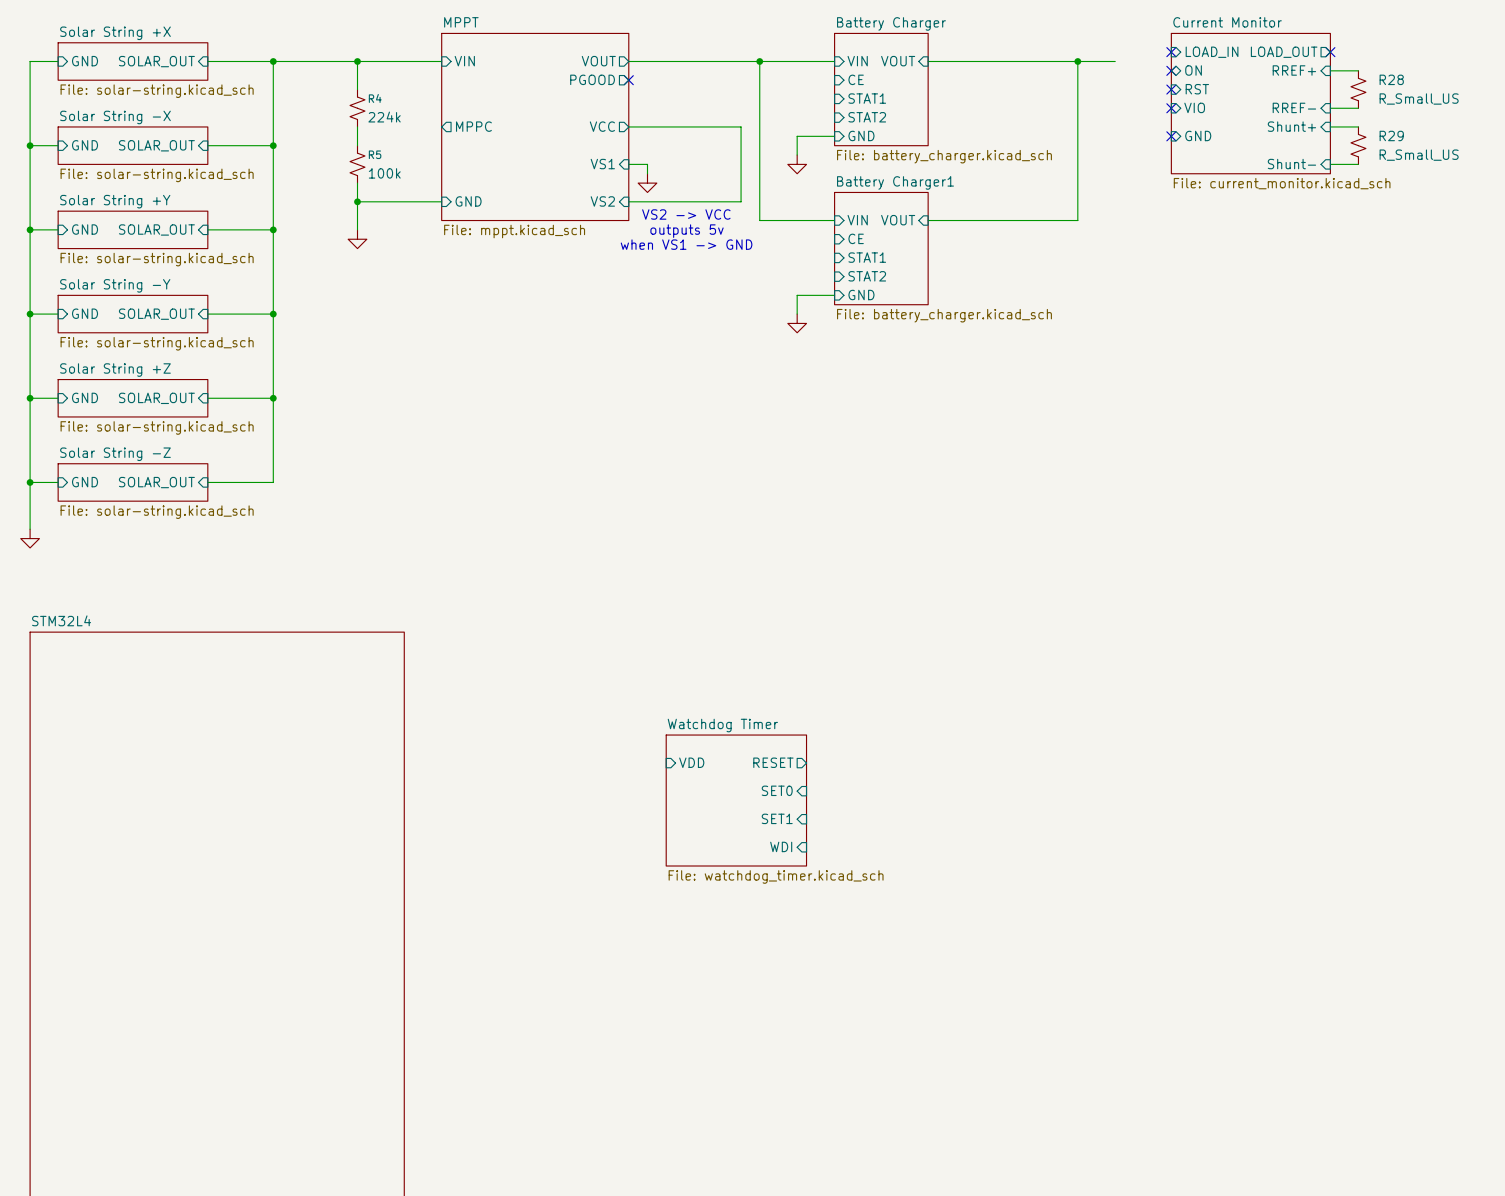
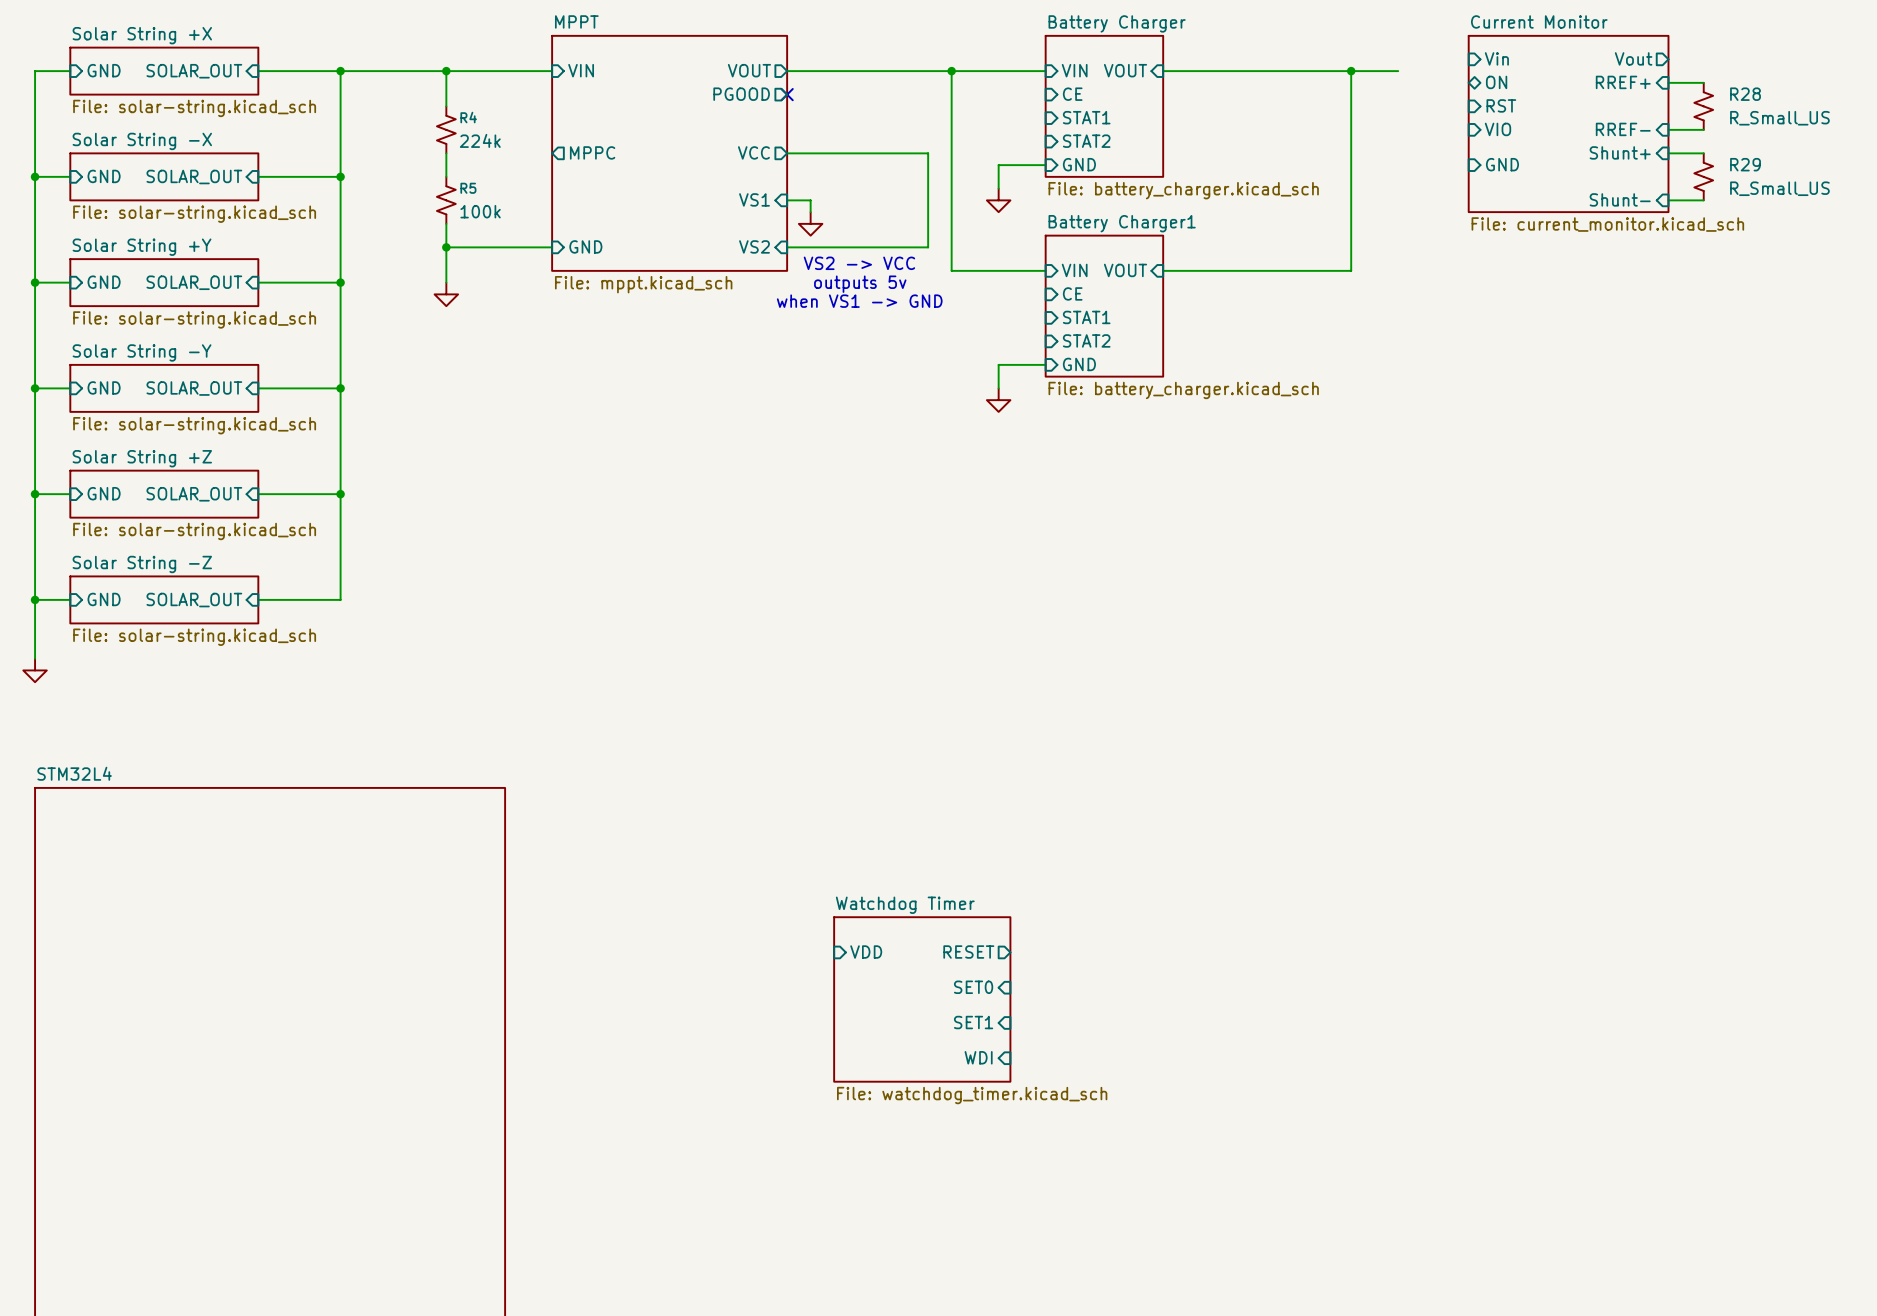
no-connect mark: (1171, 52) -> none
sheet pin: LOAD_IN (1212, 52) -> Vin (1496, 58)
sheet pin: LOAD_OUT (1284, 52) -> Vout (1633, 58)
no-connect mark: (1330, 52) -> none
no-connect mark: (1171, 70) -> none
no-connect mark: (1171, 89) -> none
no-connect mark: (1171, 108) -> none
no-connect mark: (1171, 136) -> none

